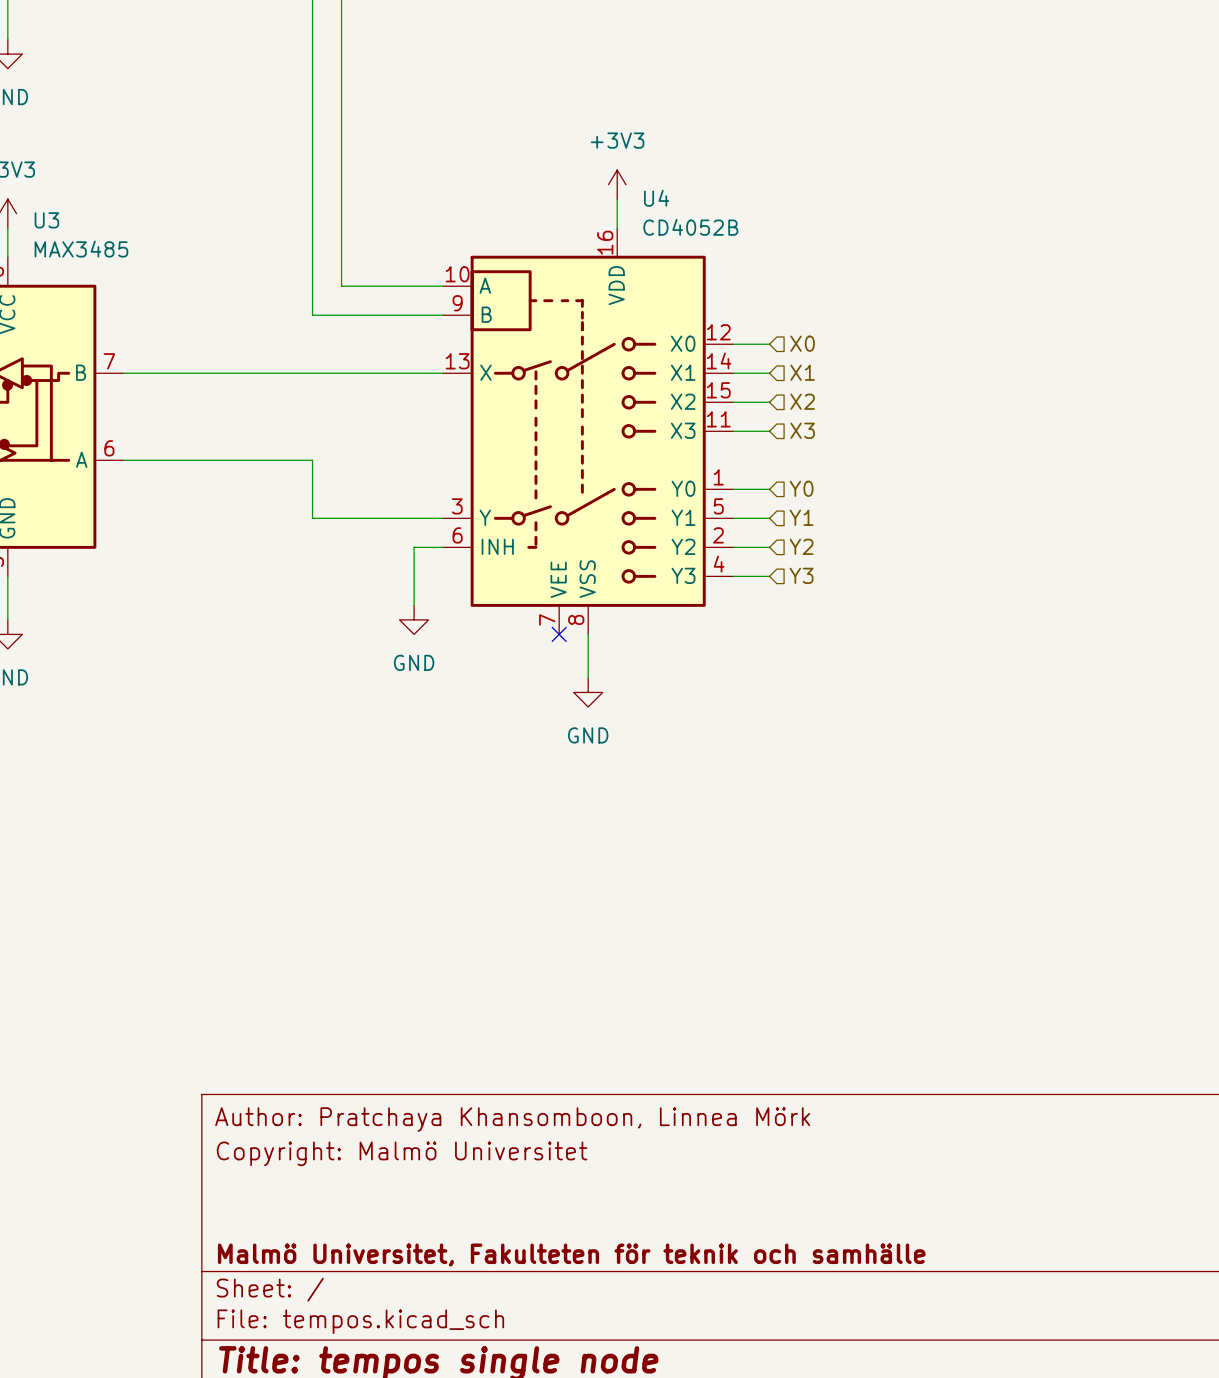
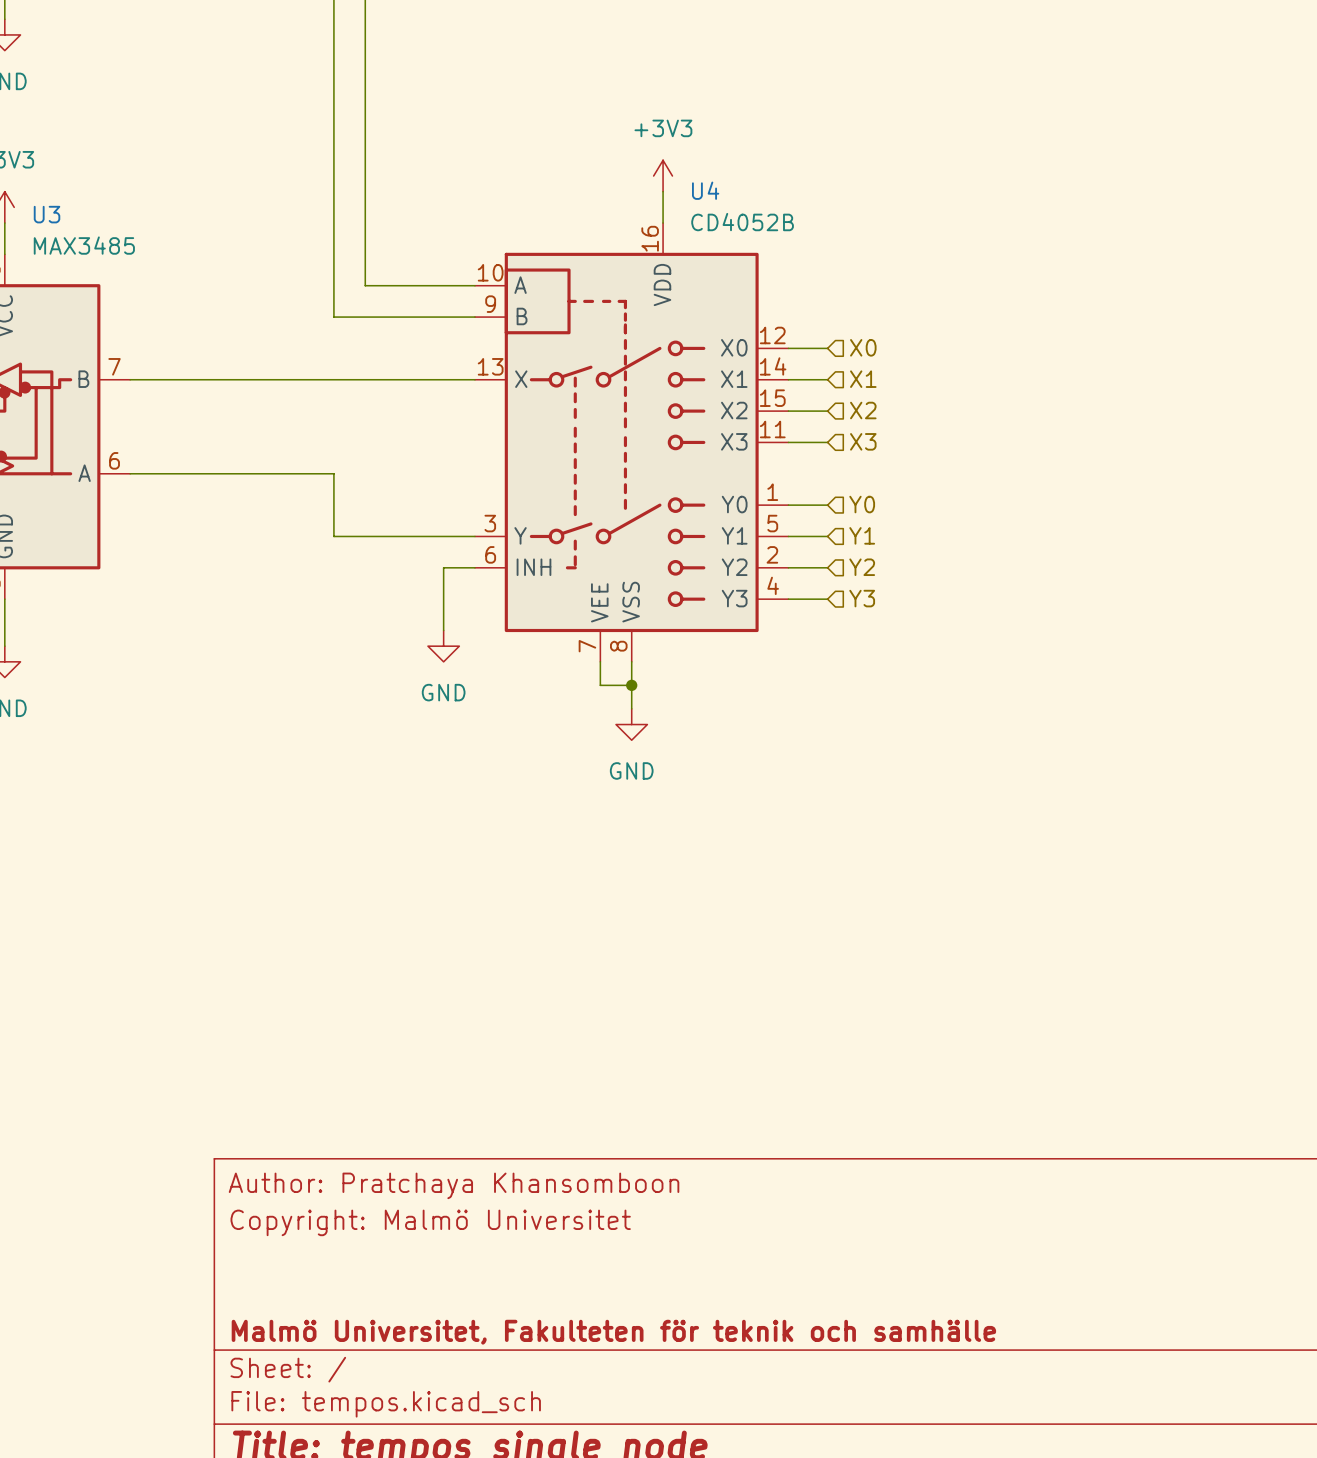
wire: none -> (600, 661) (600, 685) (631, 685)
no-connect mark: (559, 634) -> none
junction: none -> (631, 685)
title block: Author: Pratchaya Khansomboon, Linnea Mörk (512, 1119) -> Author: Pratchaya Khansomboon (454, 1185)

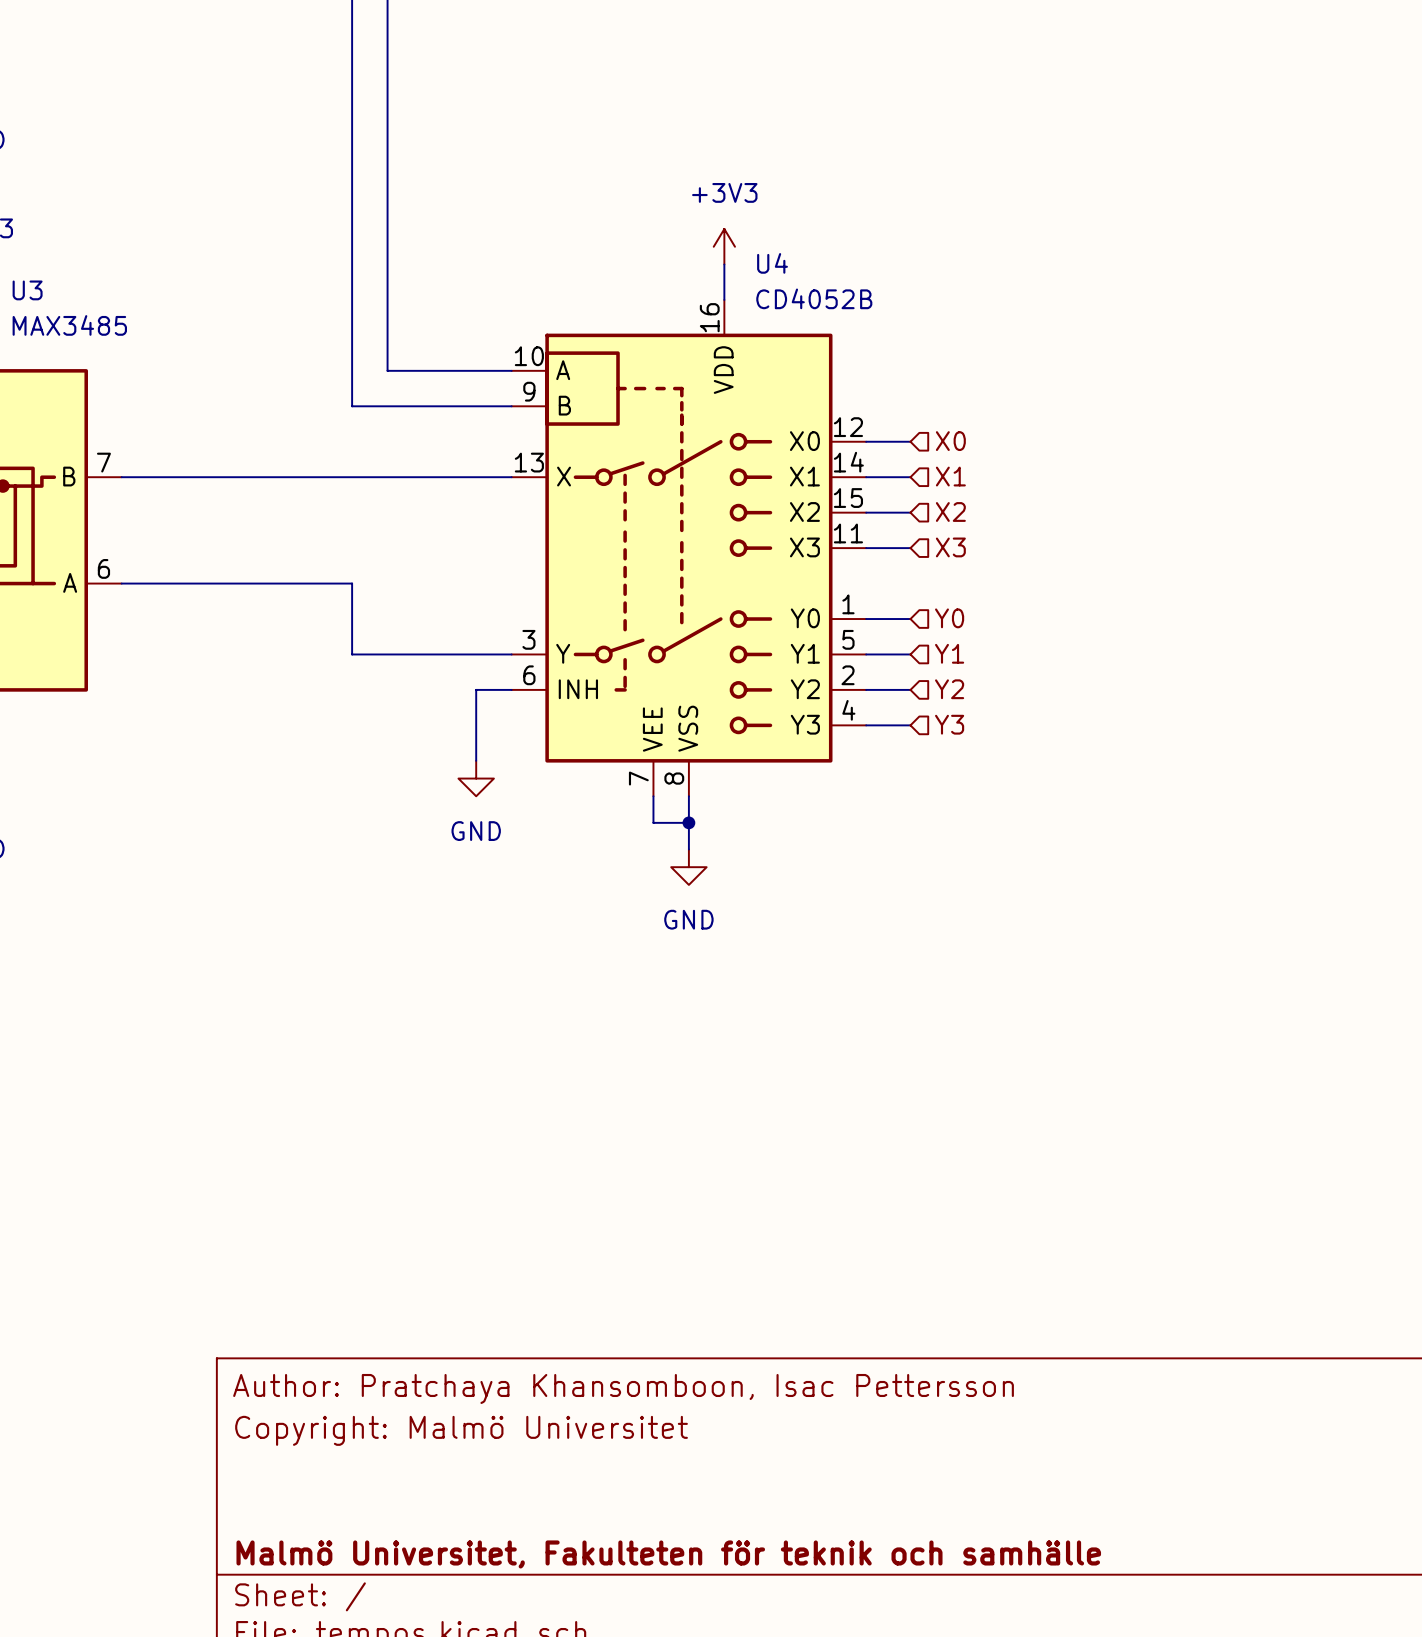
title block: Author: Pratchaya Khansomboon (454, 1185) -> Author: Pratchaya Khansomboon, Isac Pettersson (623, 1388)

